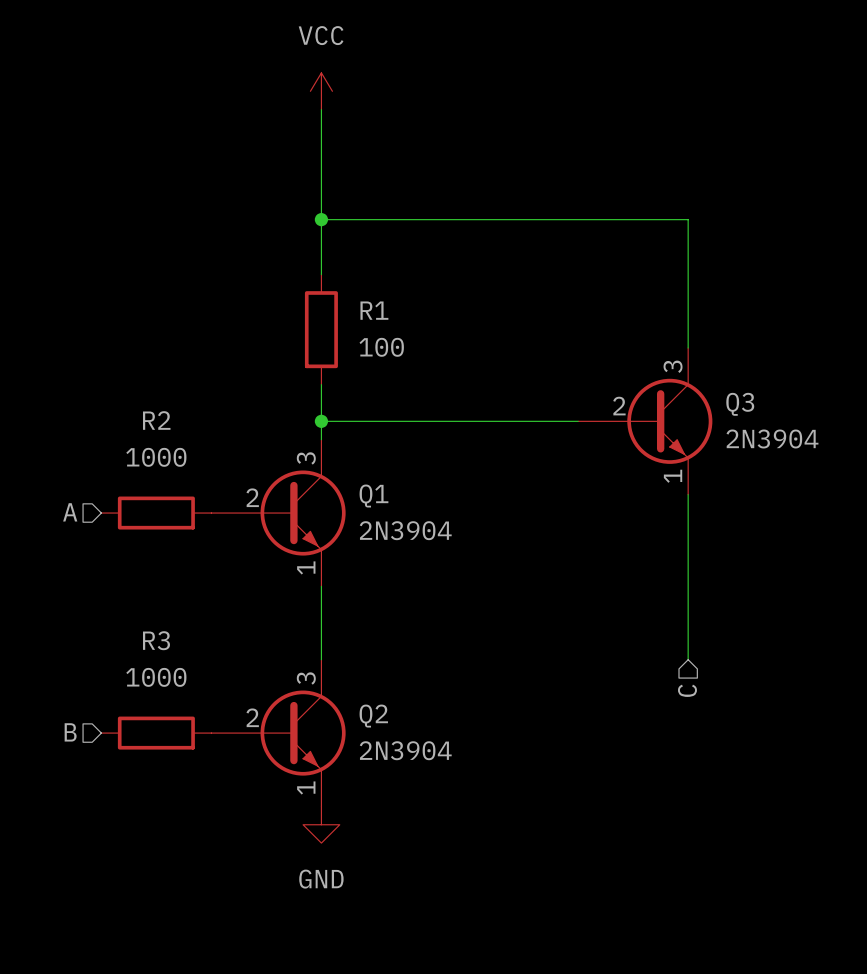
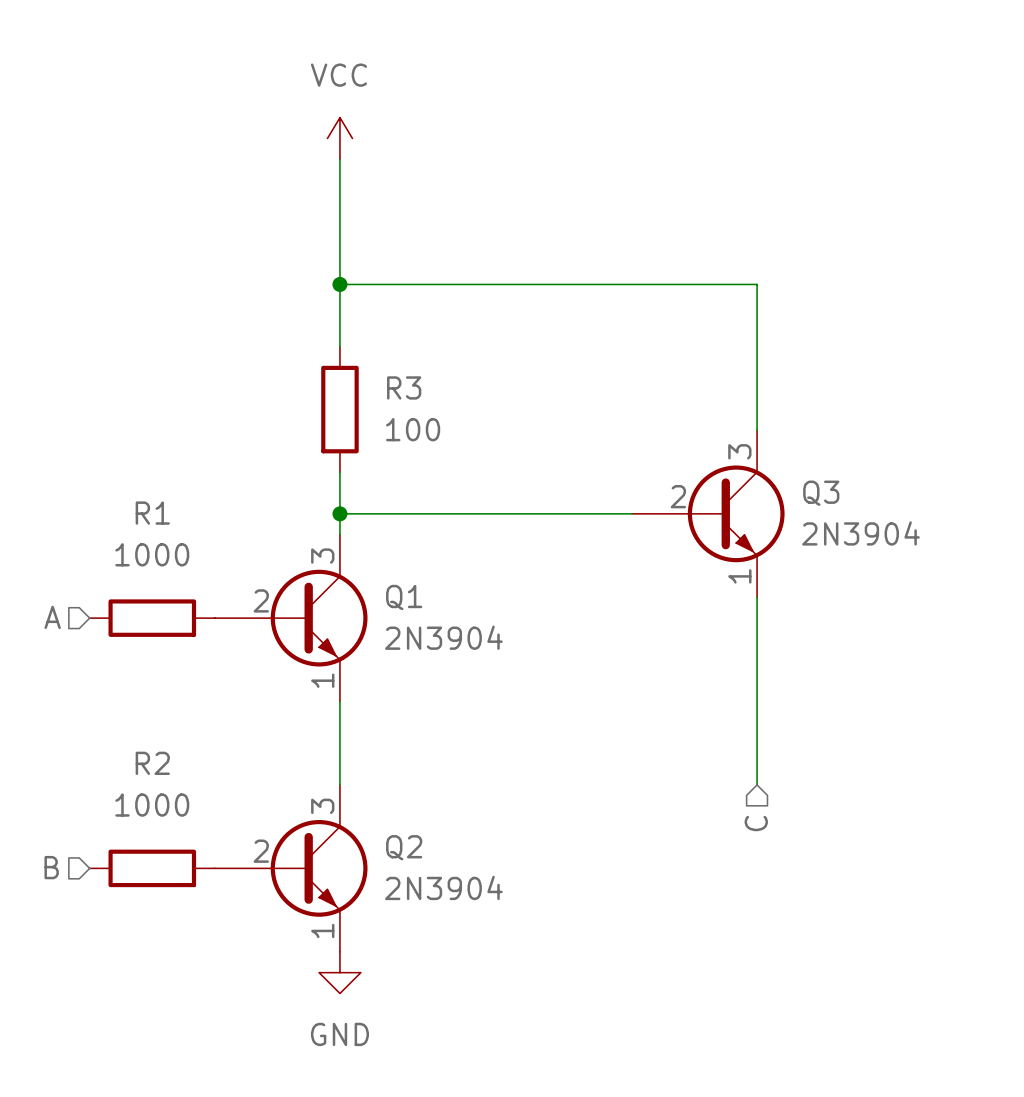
R1 name: R1 (374, 310) -> R3 (404, 387)
R2 name: R2 (156, 420) -> R1 (152, 513)
R3 name: R3 (156, 640) -> R2 (152, 763)

